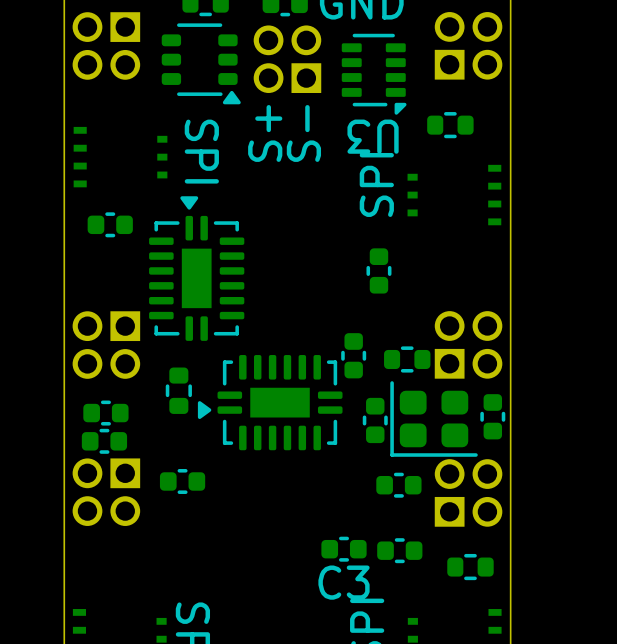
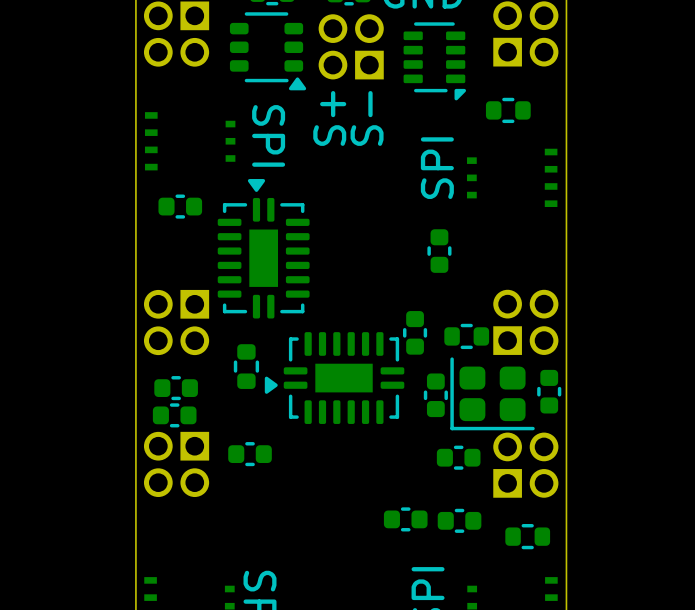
U3 name: U3 (373, 136) -> none
C3 name: C3 (344, 582) -> none

